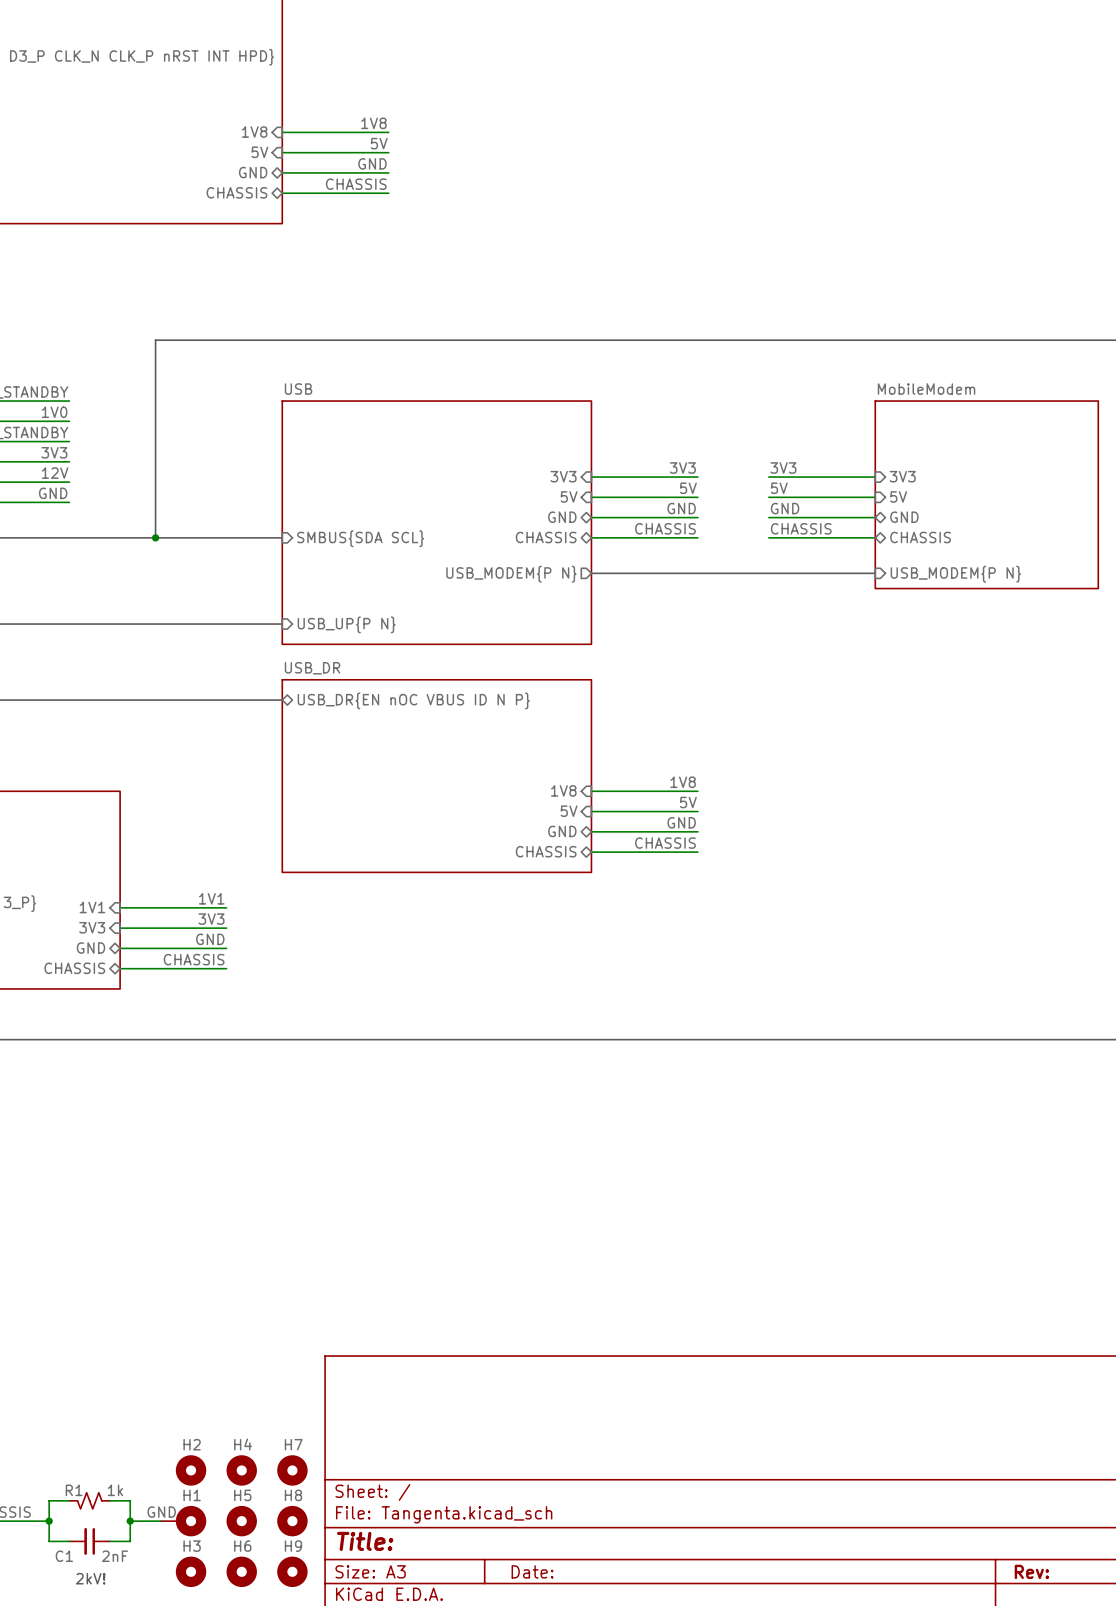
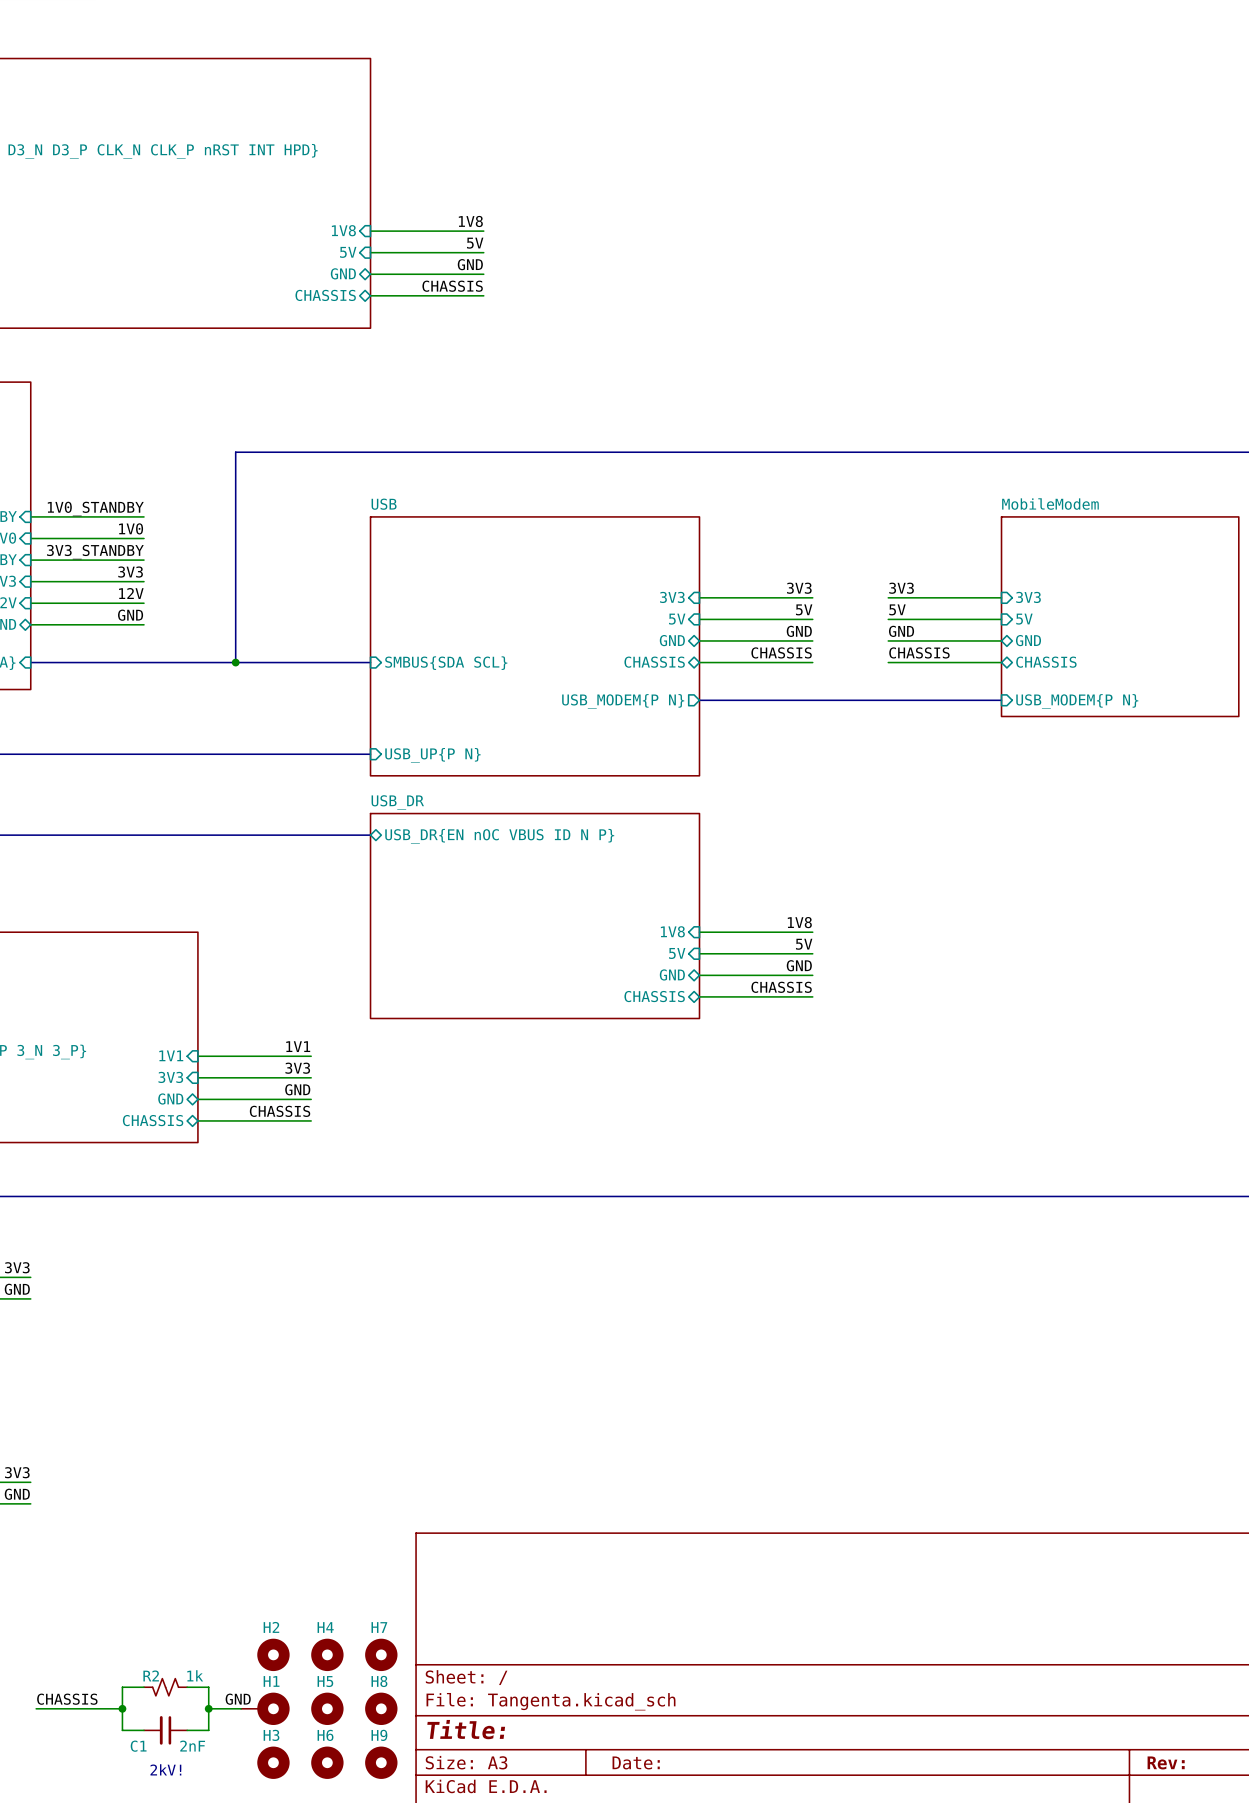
R1 name: R1 (74, 1490) -> R2 (151, 1675)

